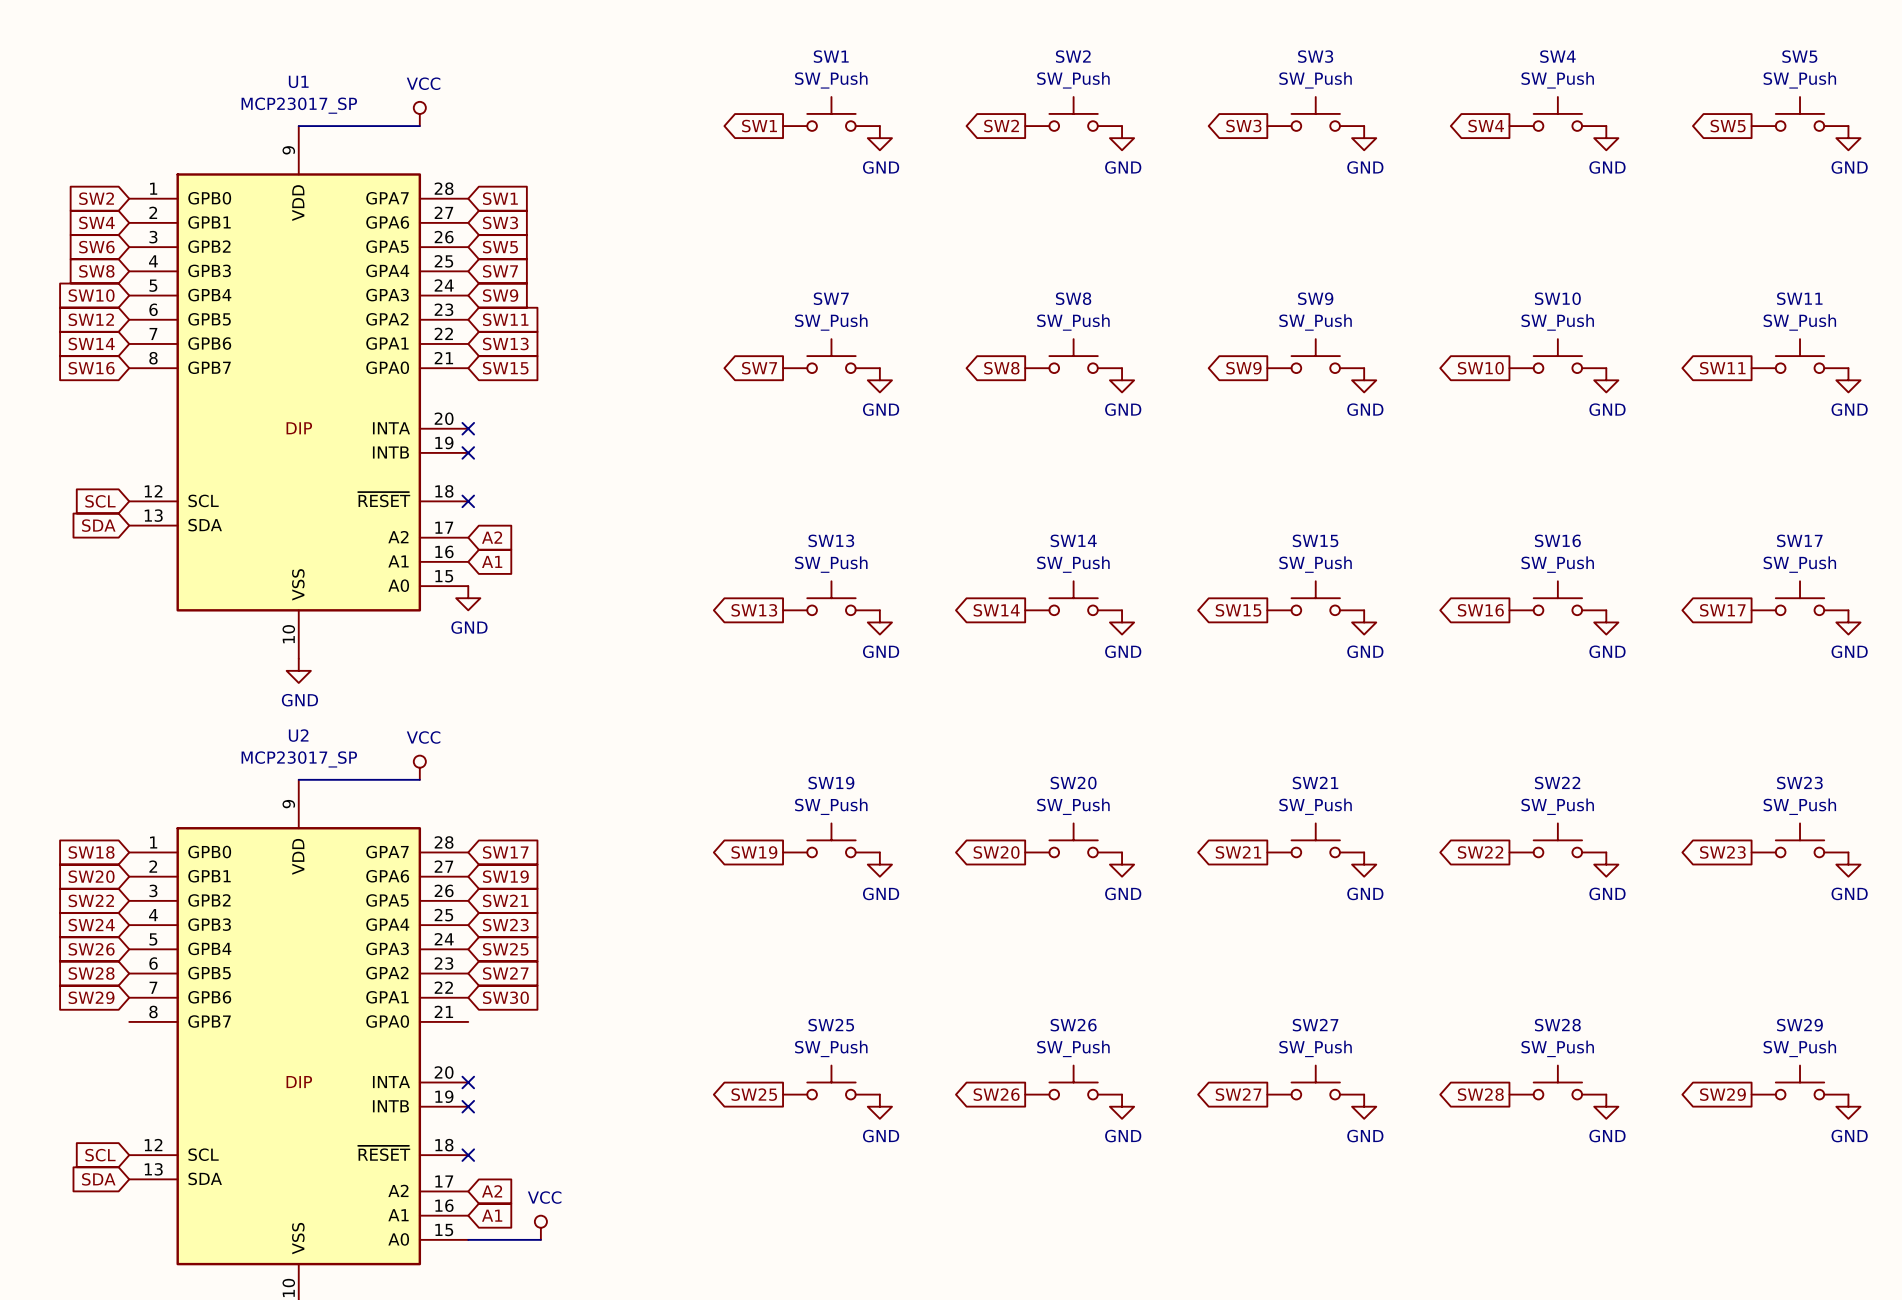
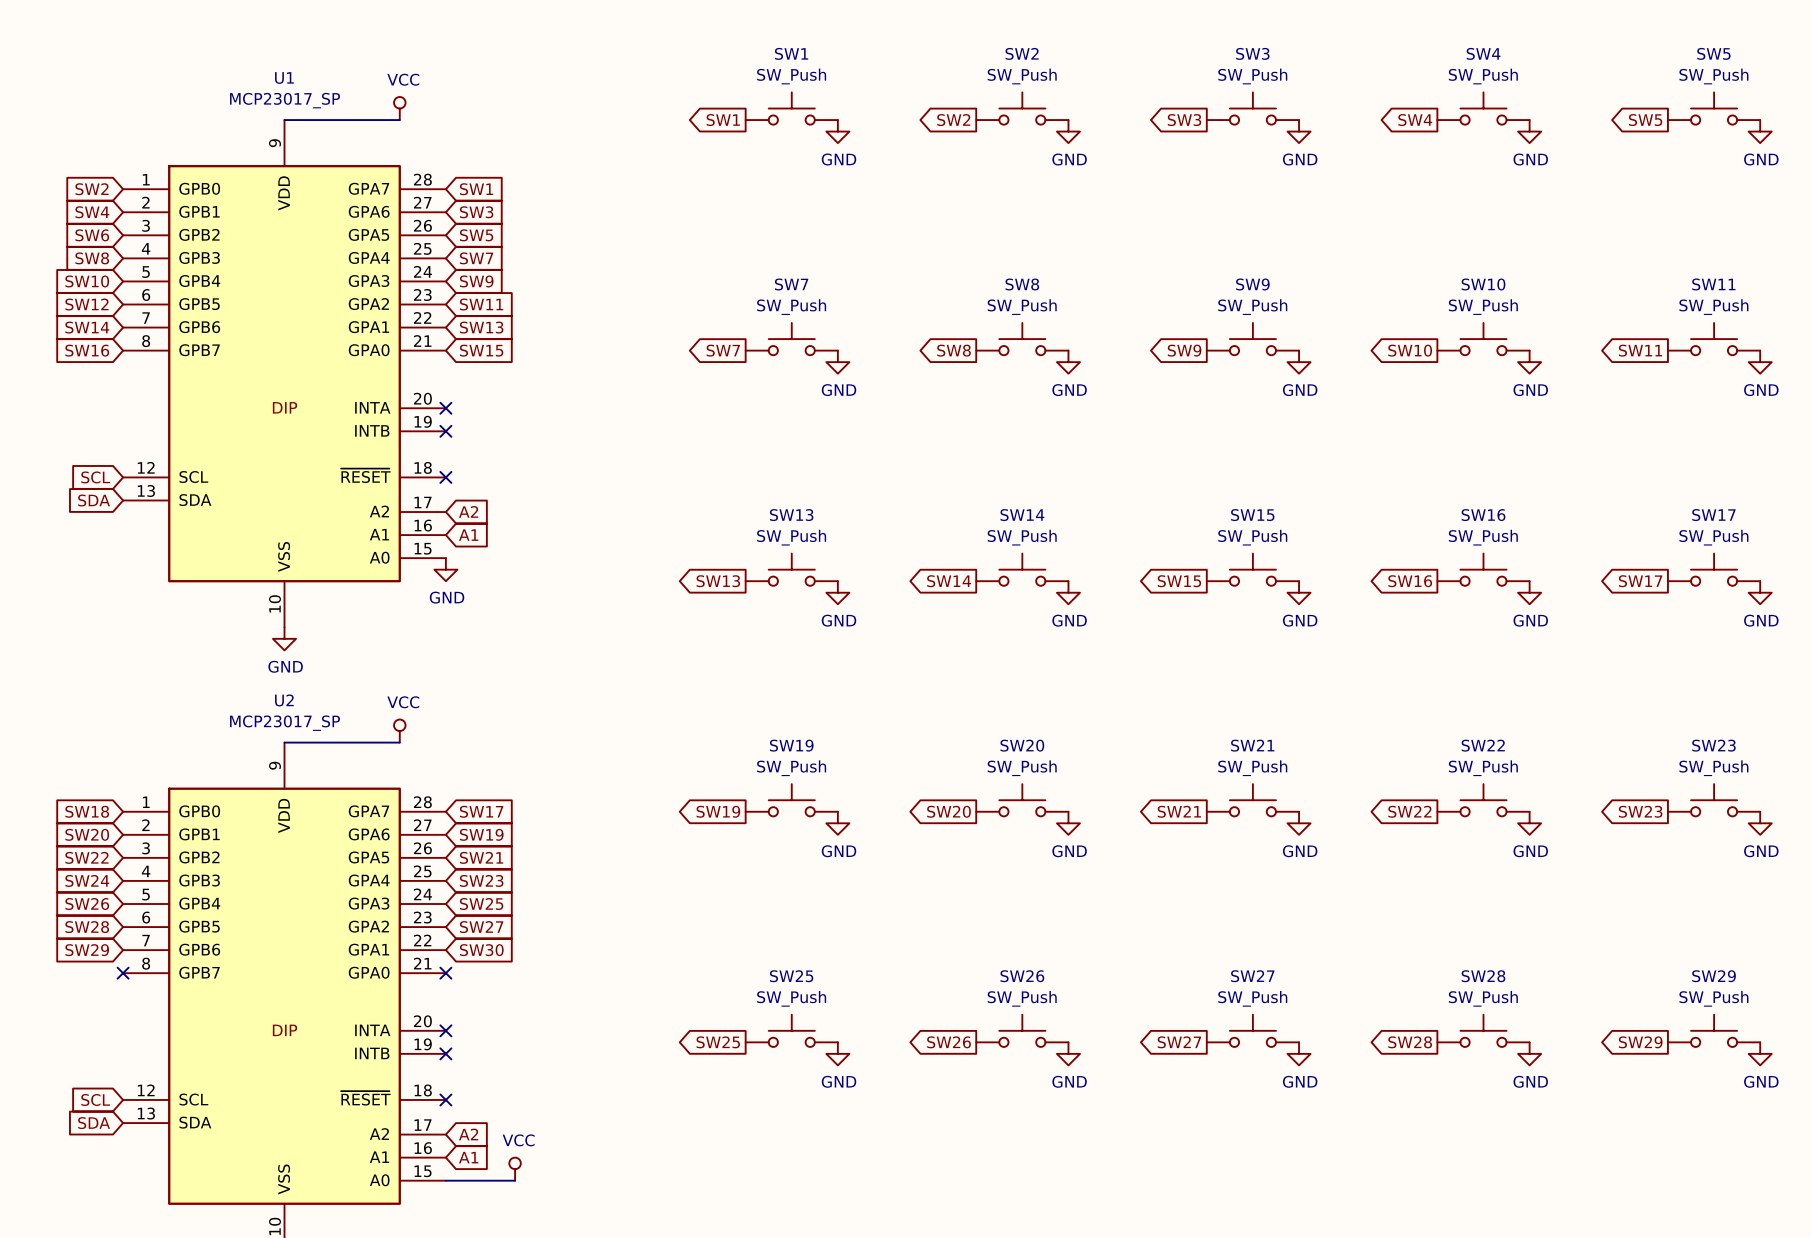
no-connect mark: none -> (123, 973)
no-connect mark: none -> (445, 973)

